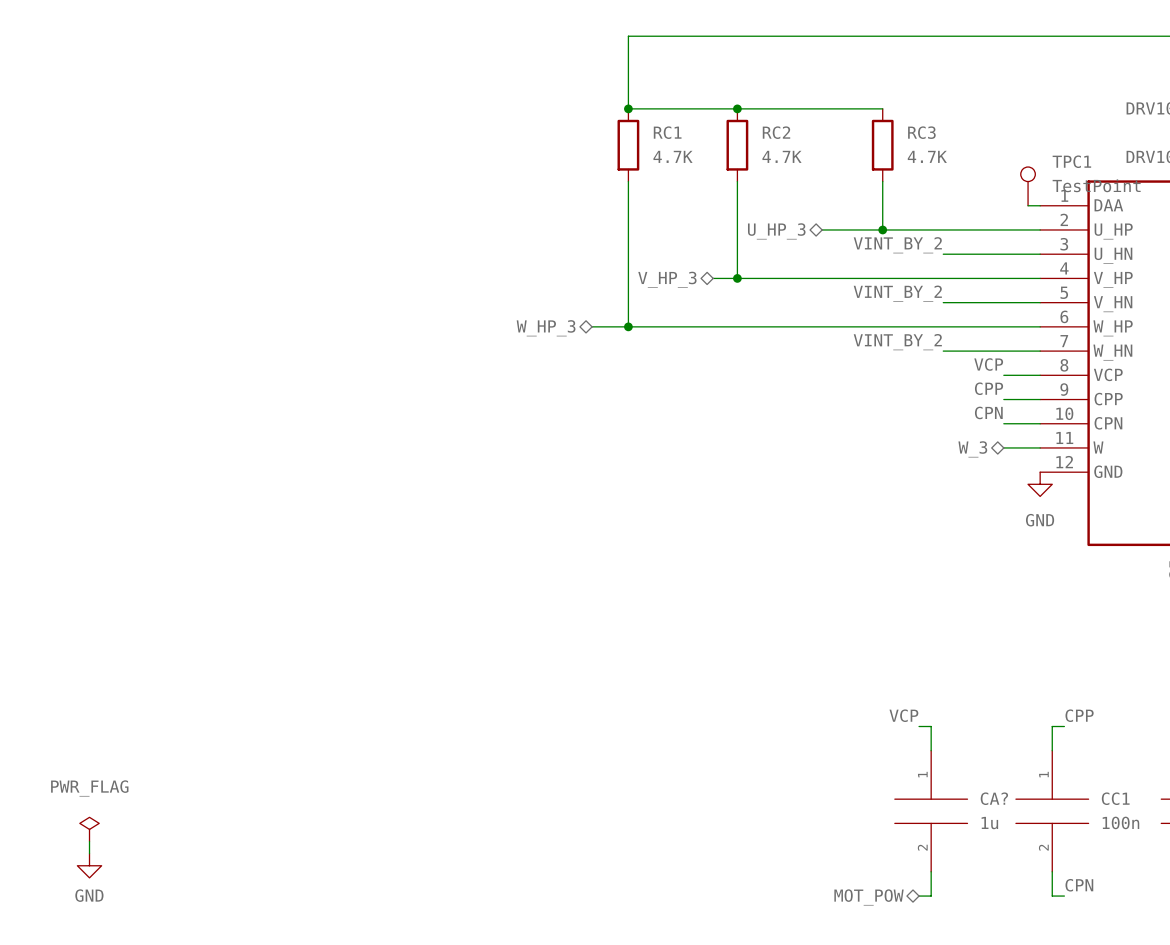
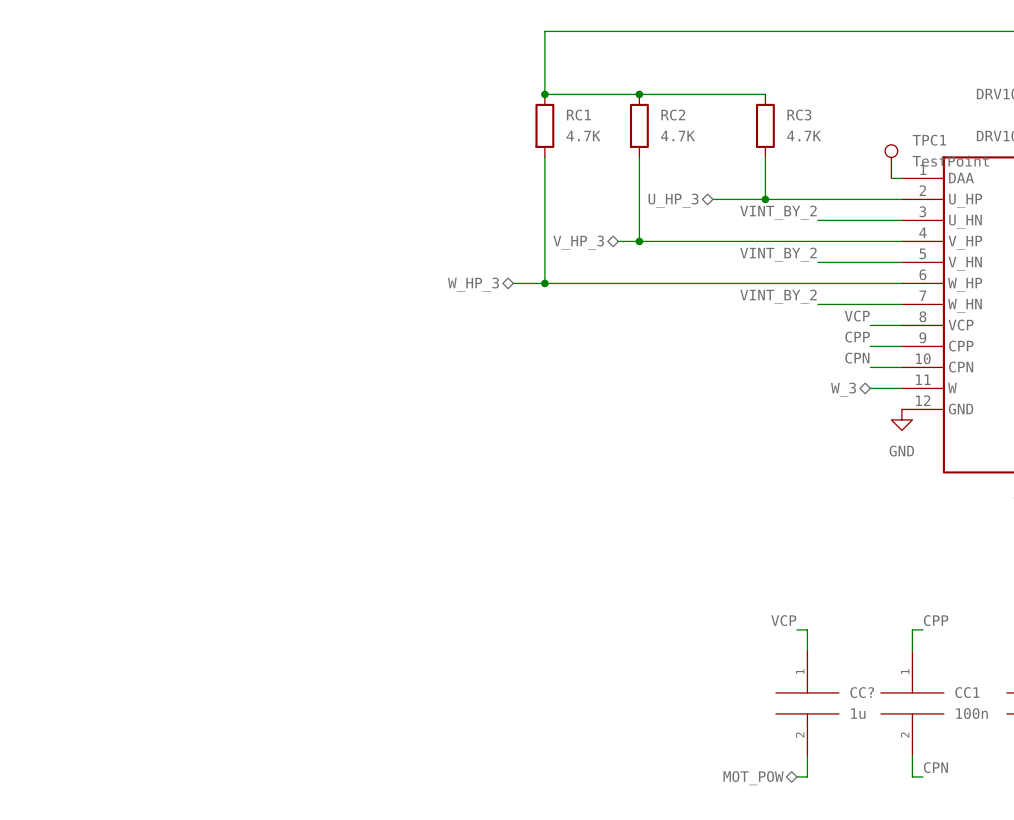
CA? name: CA? (994, 798) -> CC? (862, 692)
power symbol: PWR_FLAG (89, 829) -> none
wire: (89, 841) (89, 853) -> none
power symbol: GND (89, 865) -> none

